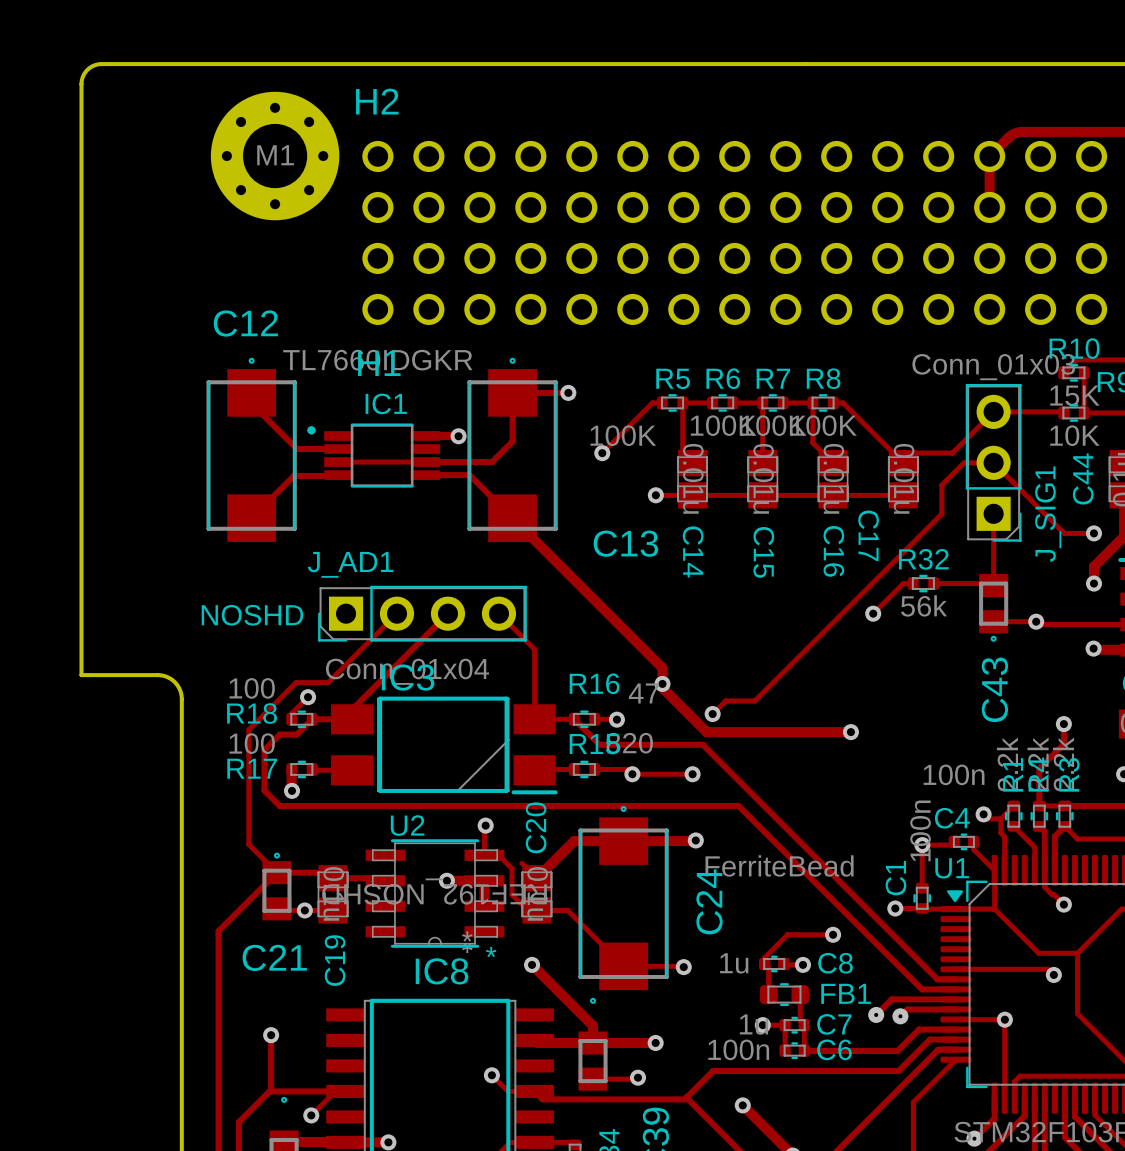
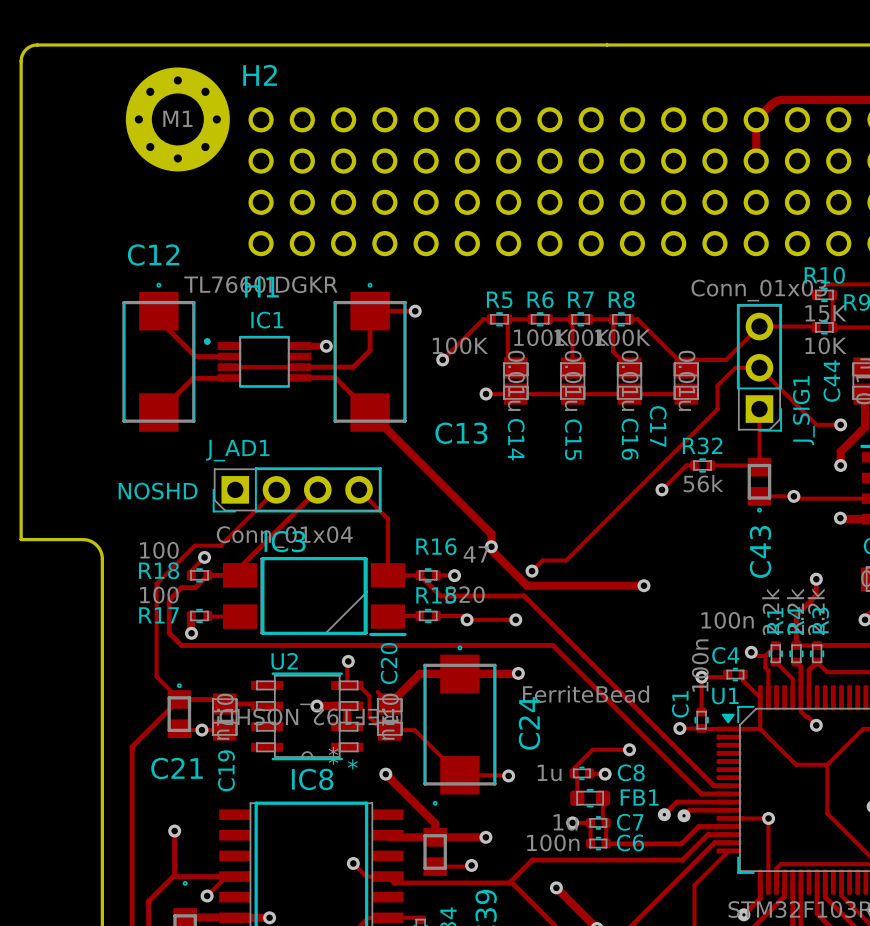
track: (956, 969) (1048, 969) (1053, 974) -> none
via: (1053, 974) -> none

